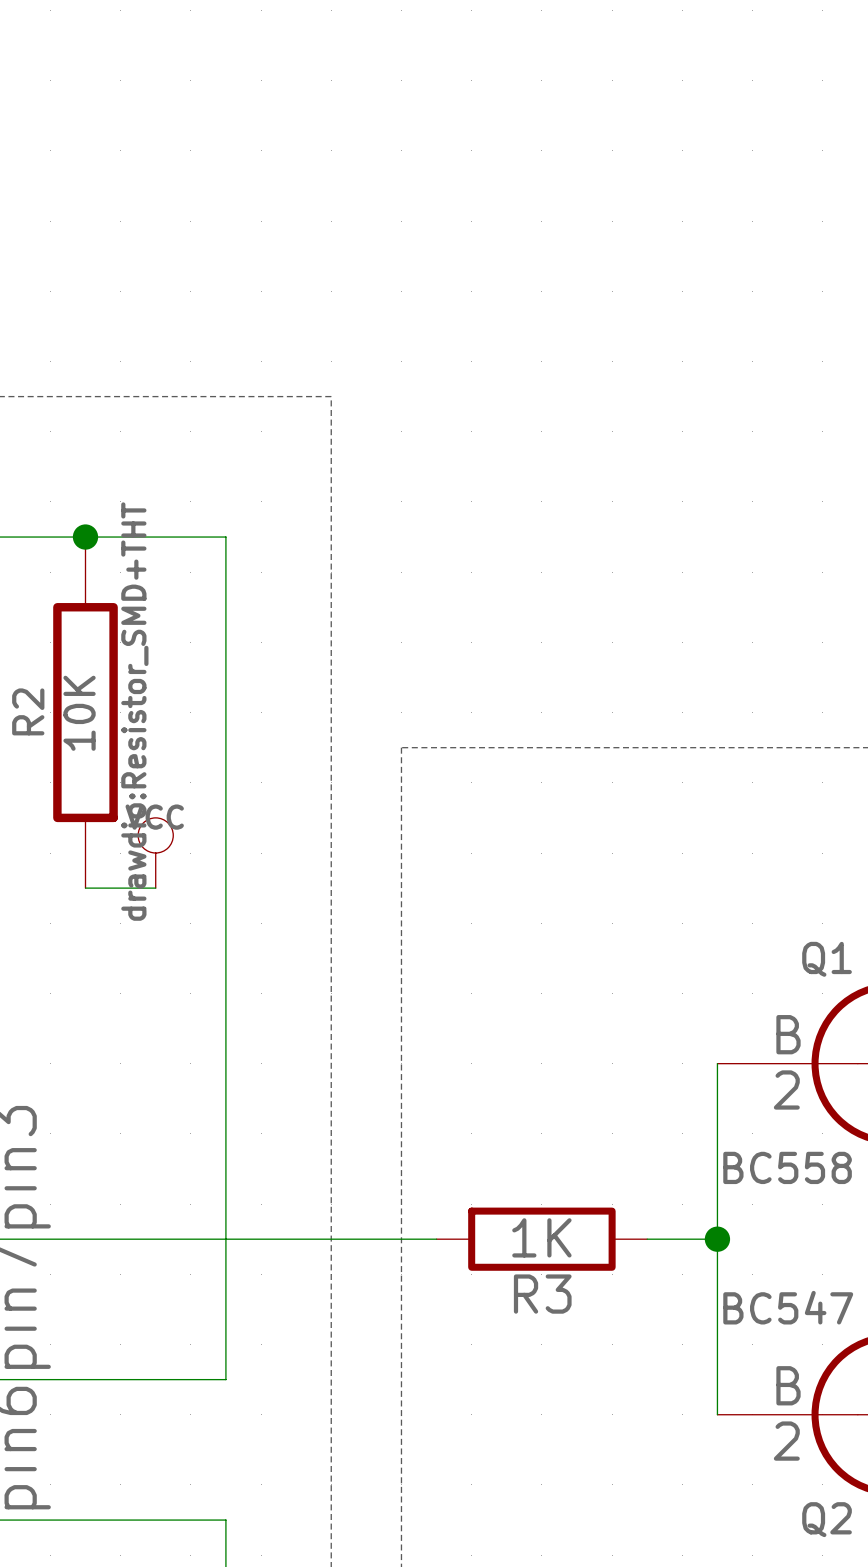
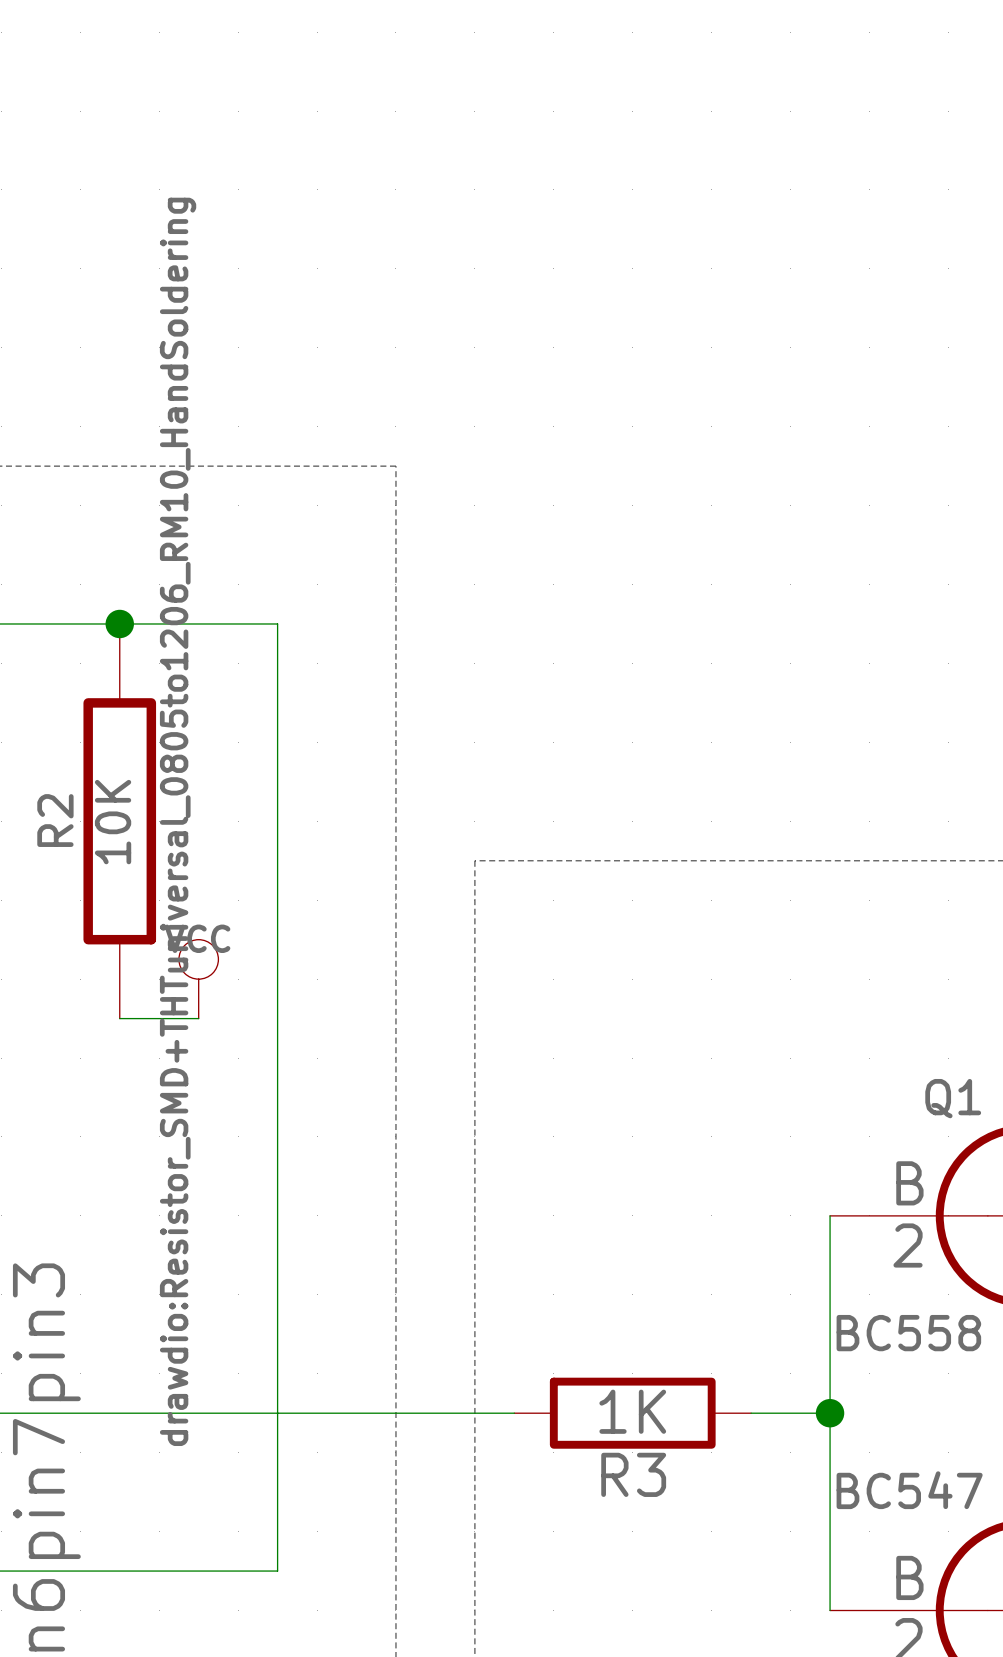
R2 text: drawdio:Resistor_SMD+THT (134, 711) -> drawdio:Resistor_SMD+THTuniversal_0805to1206_RM10_HandSoldering (178, 821)

